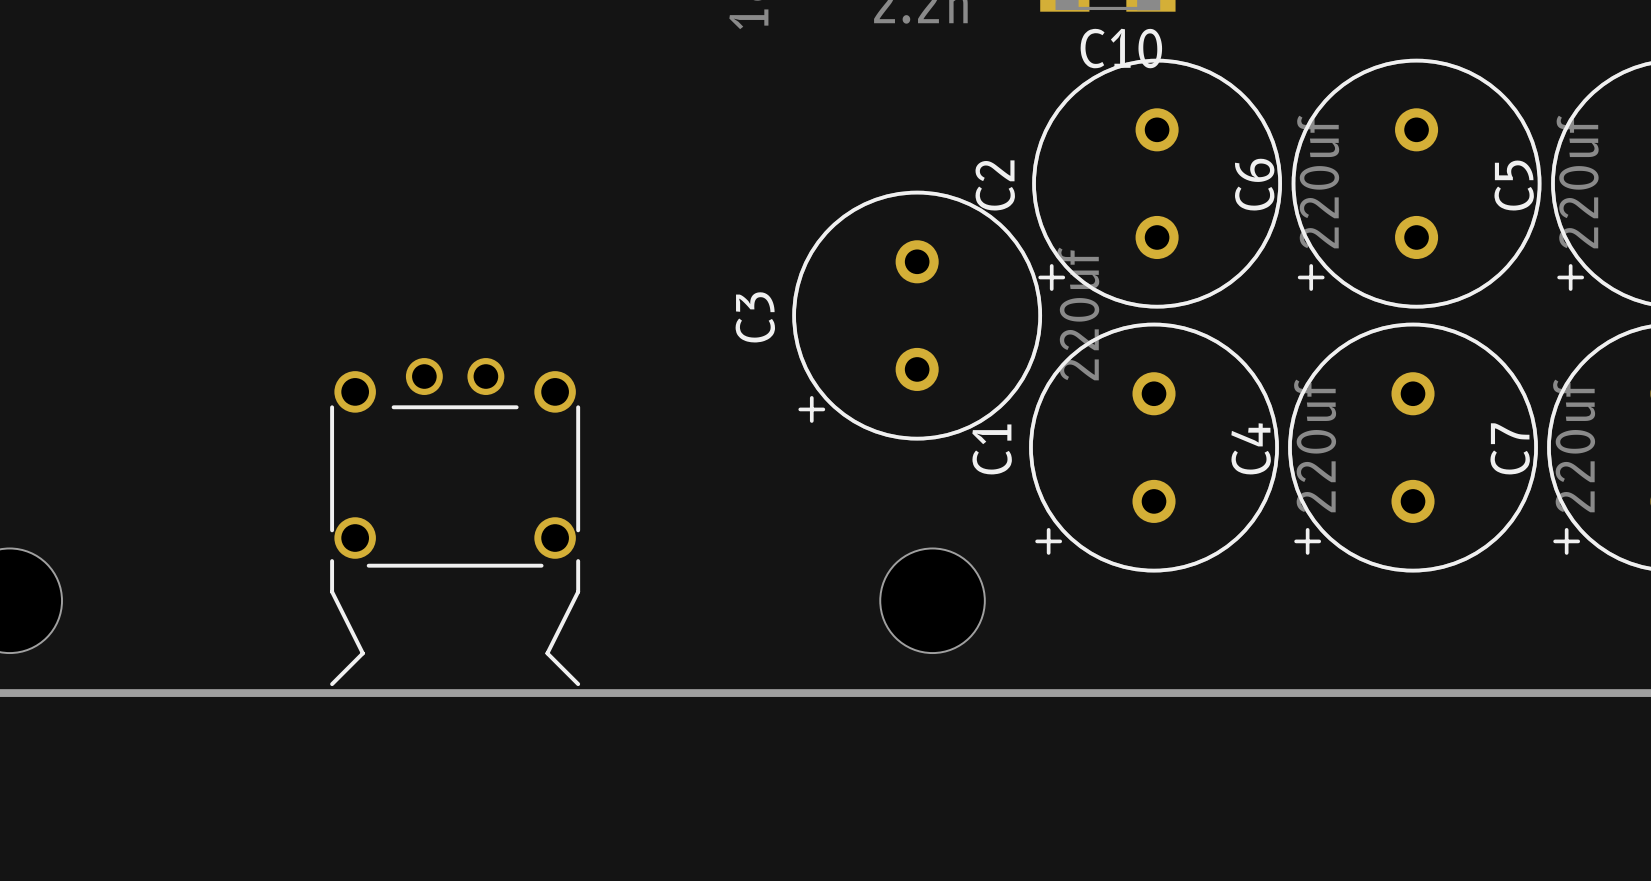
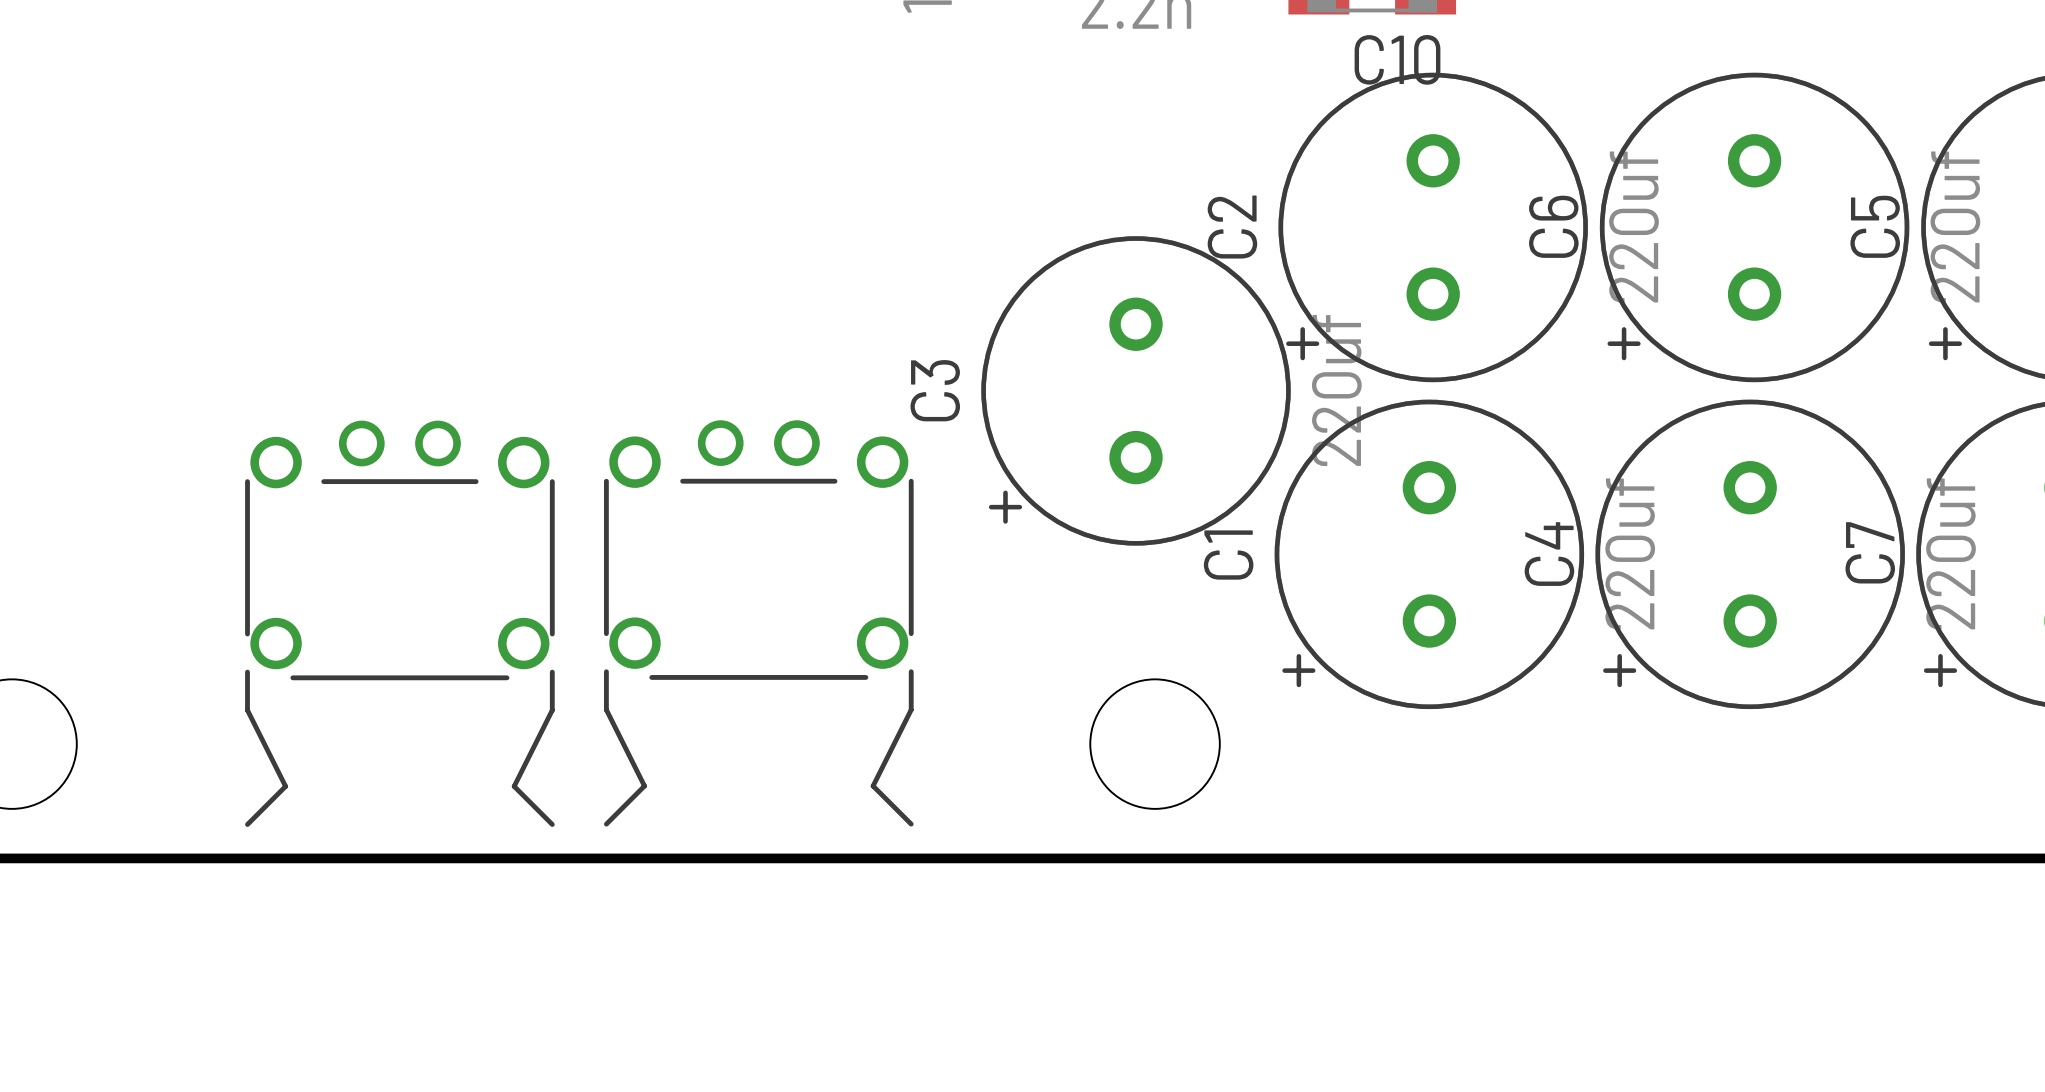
part: none -> (399, 623)
part: none -> (758, 623)
part: (455, 522) -> none

